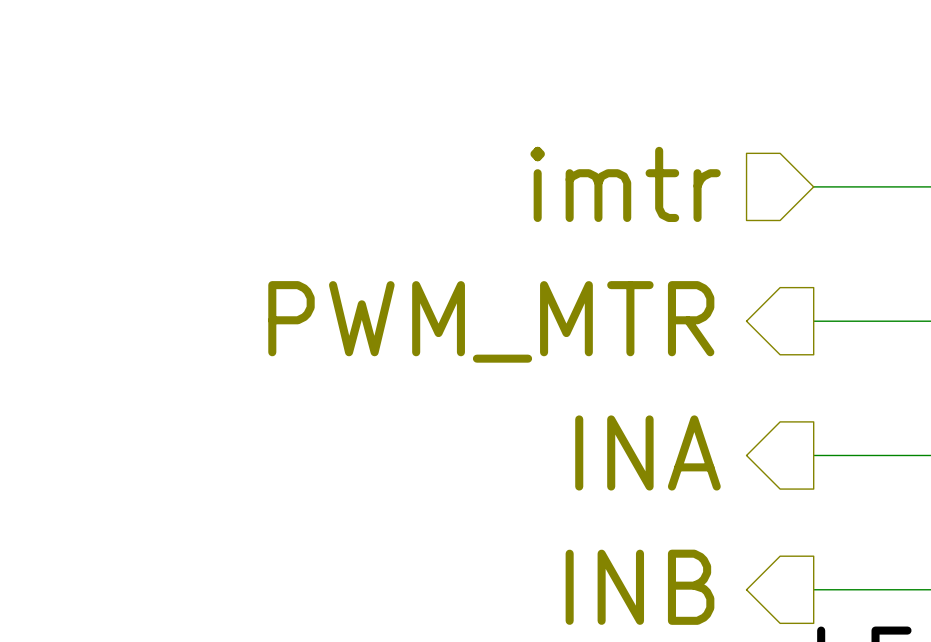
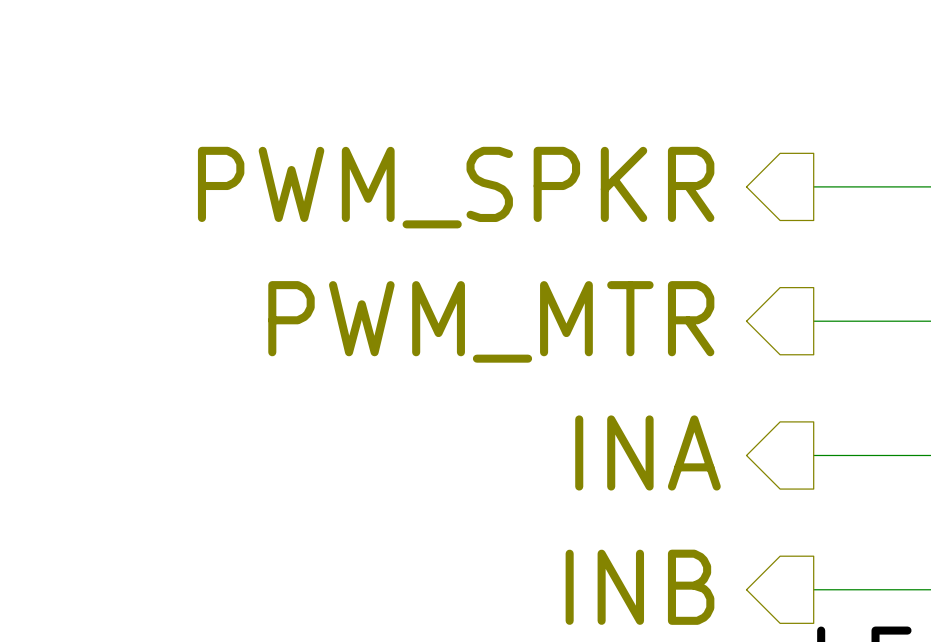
hierarchical label shape: input (625, 184) -> output (456, 187)
hierarchical label: imtr (625, 184) -> PWM_SPKR (456, 187)

